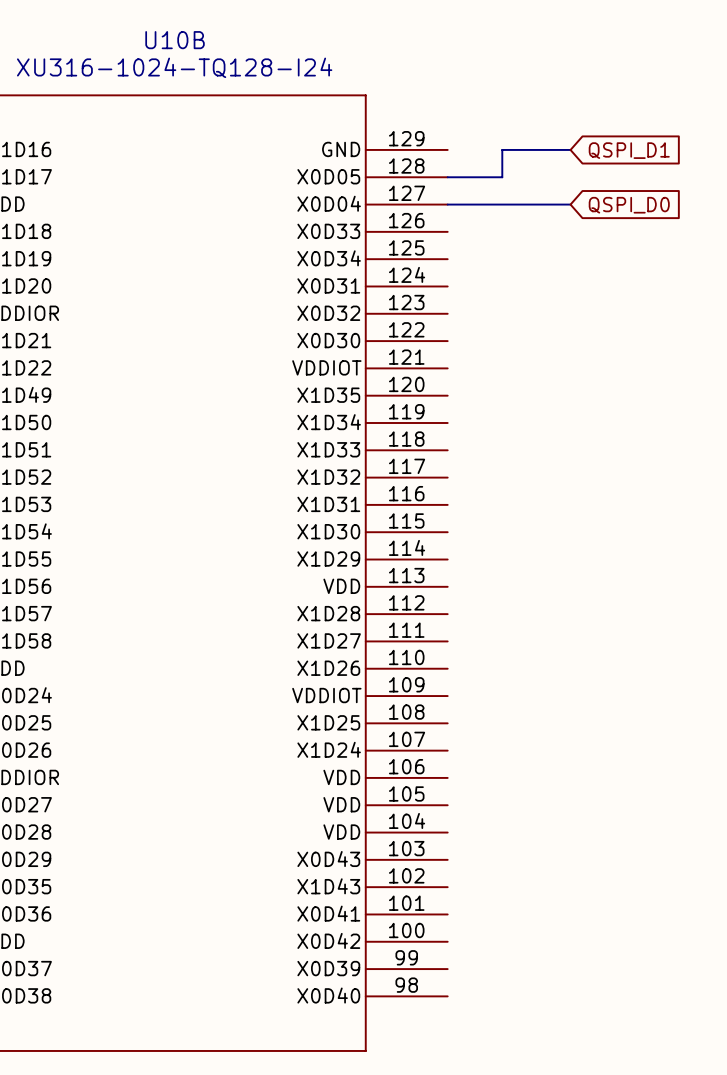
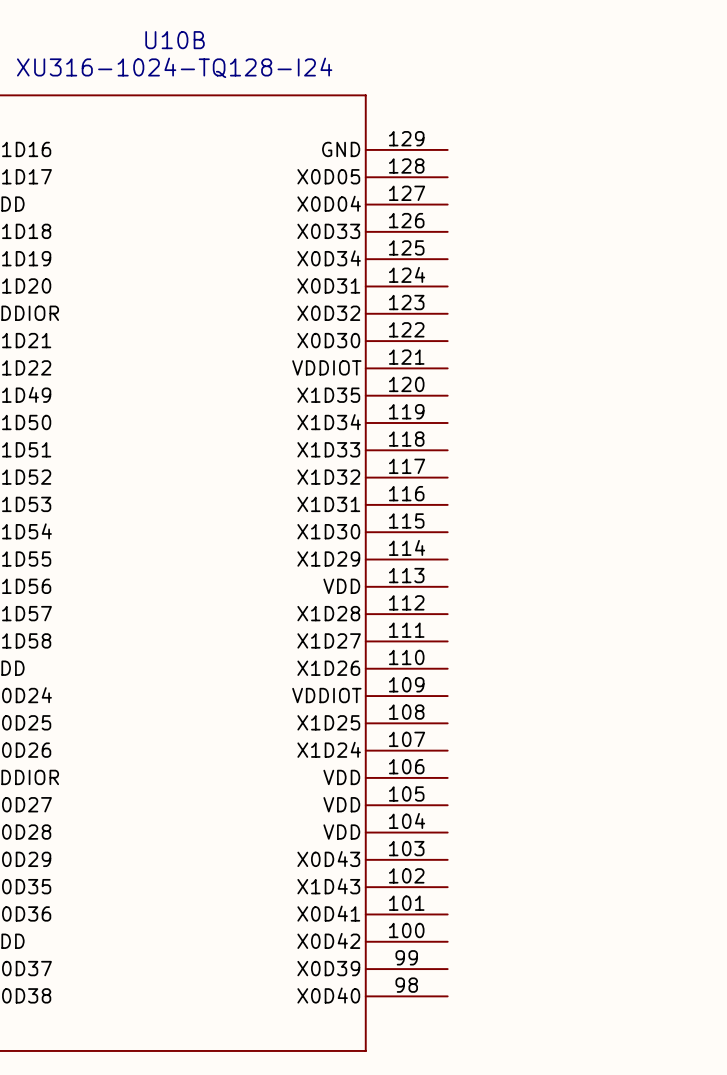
wire: (570, 149) (502, 149) (502, 177) (447, 177) -> none
global label: QSPI_D1 (629, 150) -> none
wire: (447, 204) (570, 204) -> none
global label: QSPI_D0 (629, 205) -> none

